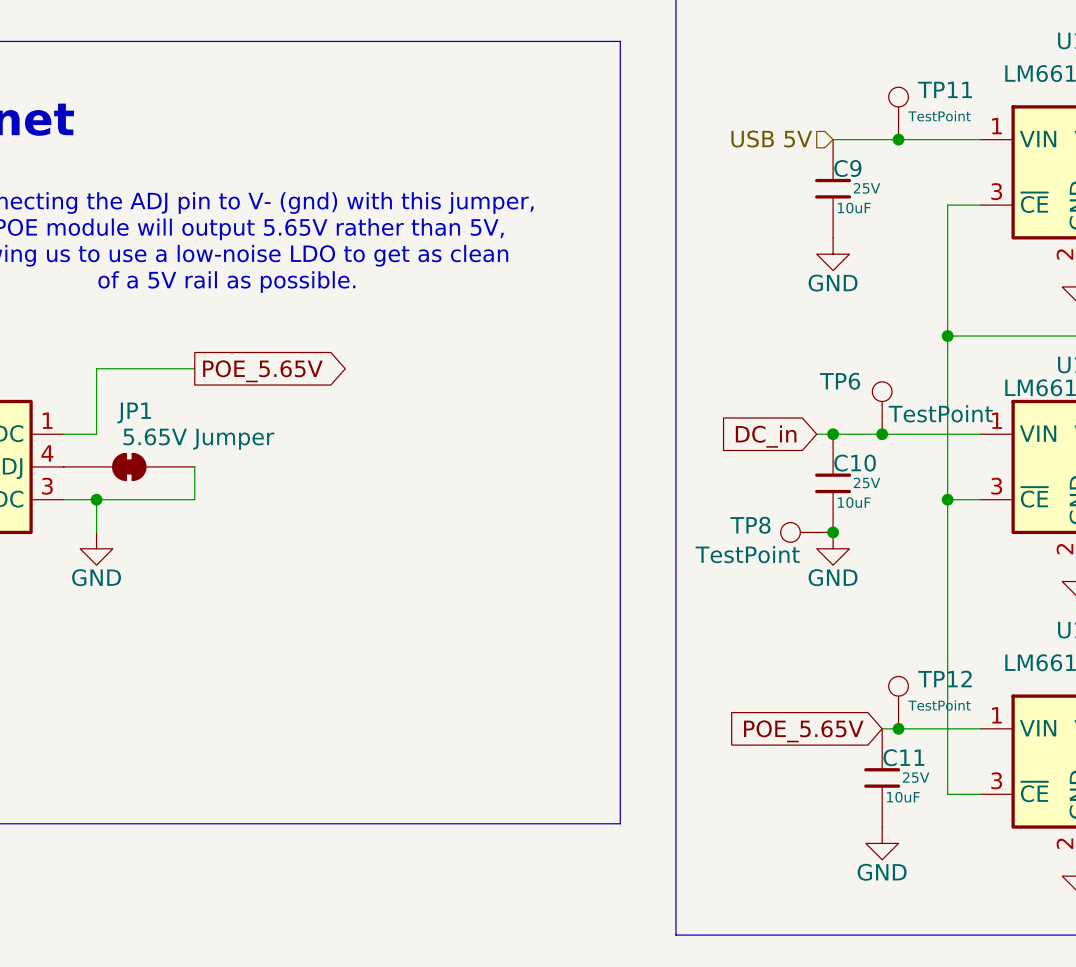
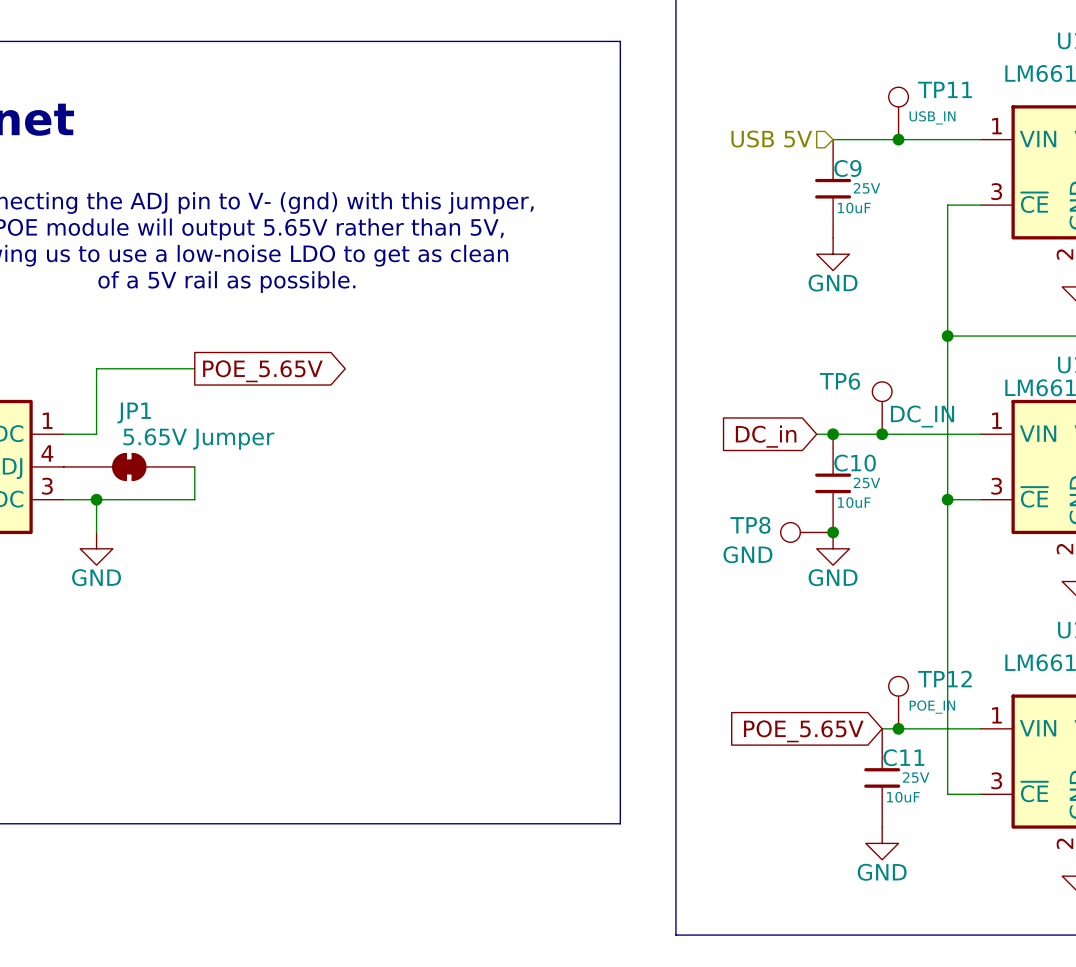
TP11 value: TestPoint (939, 116) -> USB_IN (932, 117)
TP6 value: TestPoint (940, 413) -> DC_IN (922, 416)
TP8 value: TestPoint (747, 554) -> GND (747, 554)
TP12 value: TestPoint (939, 705) -> POE_IN (932, 707)

